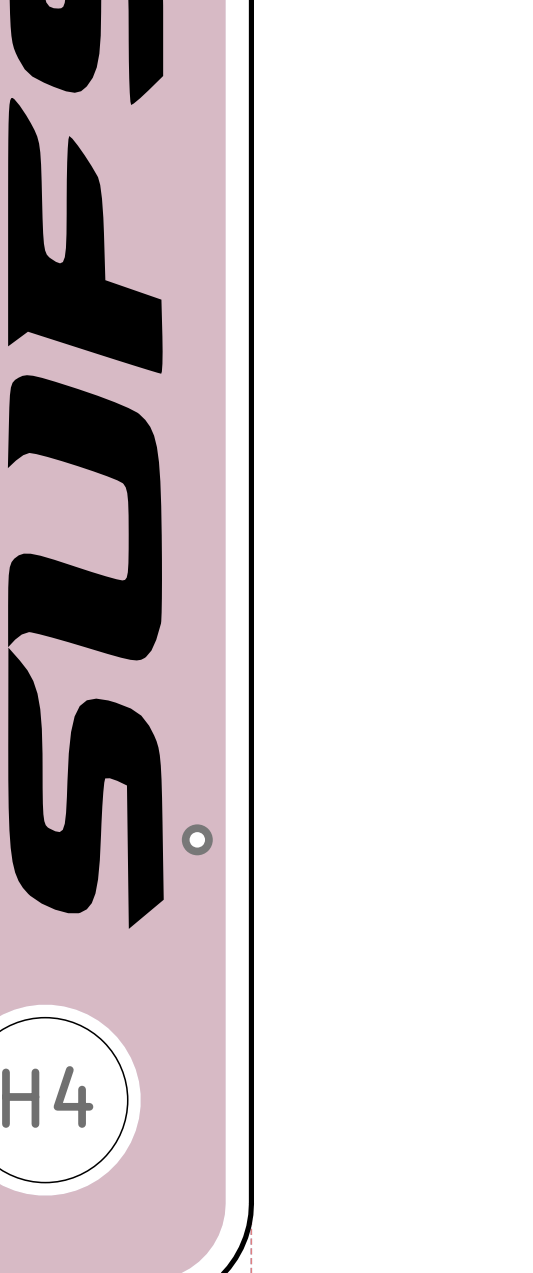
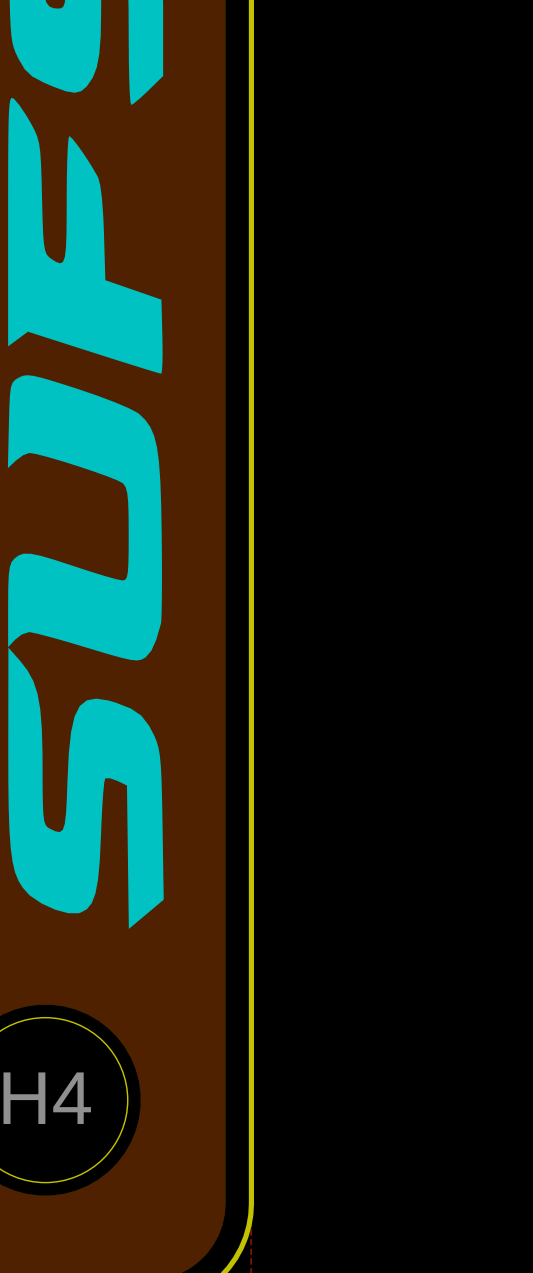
via: (197, 839) -> none

